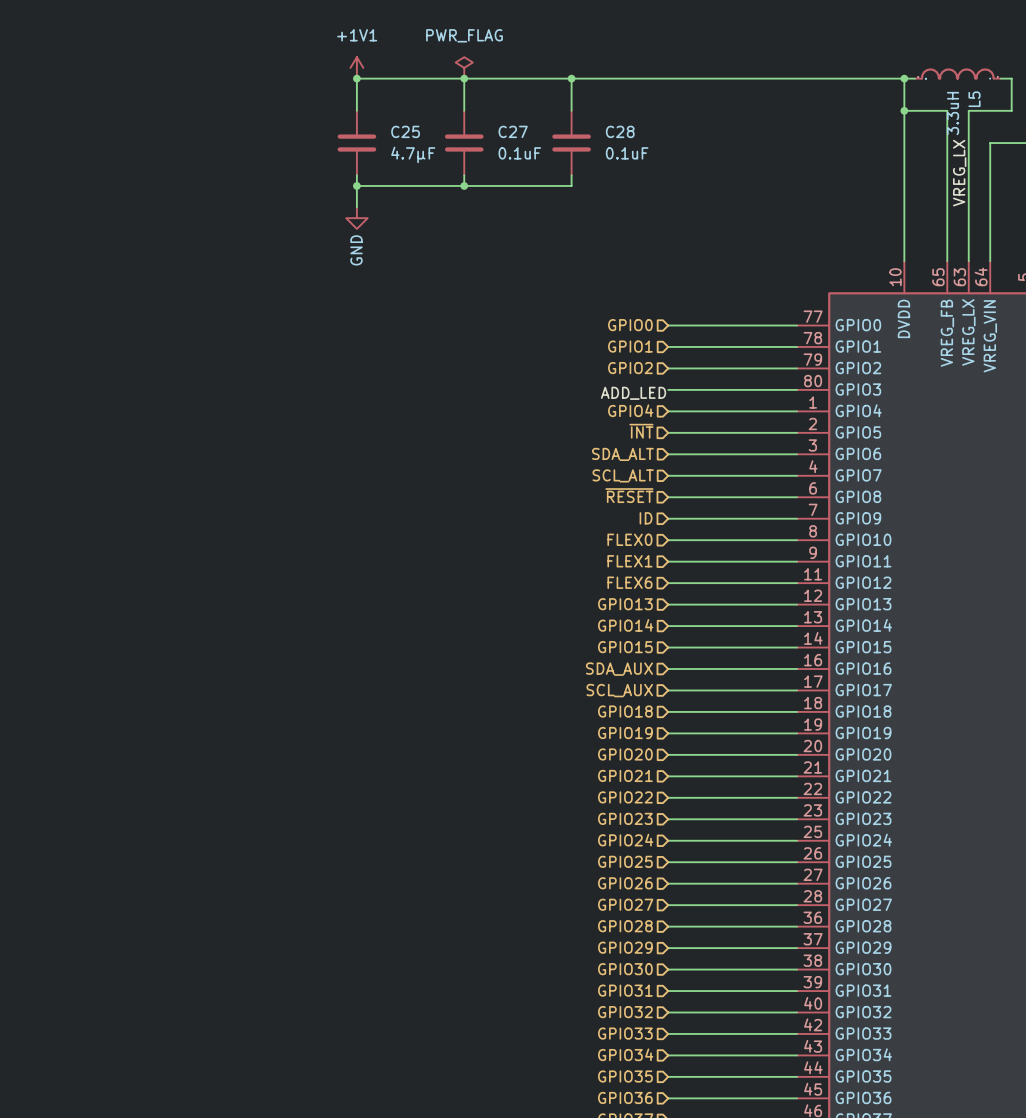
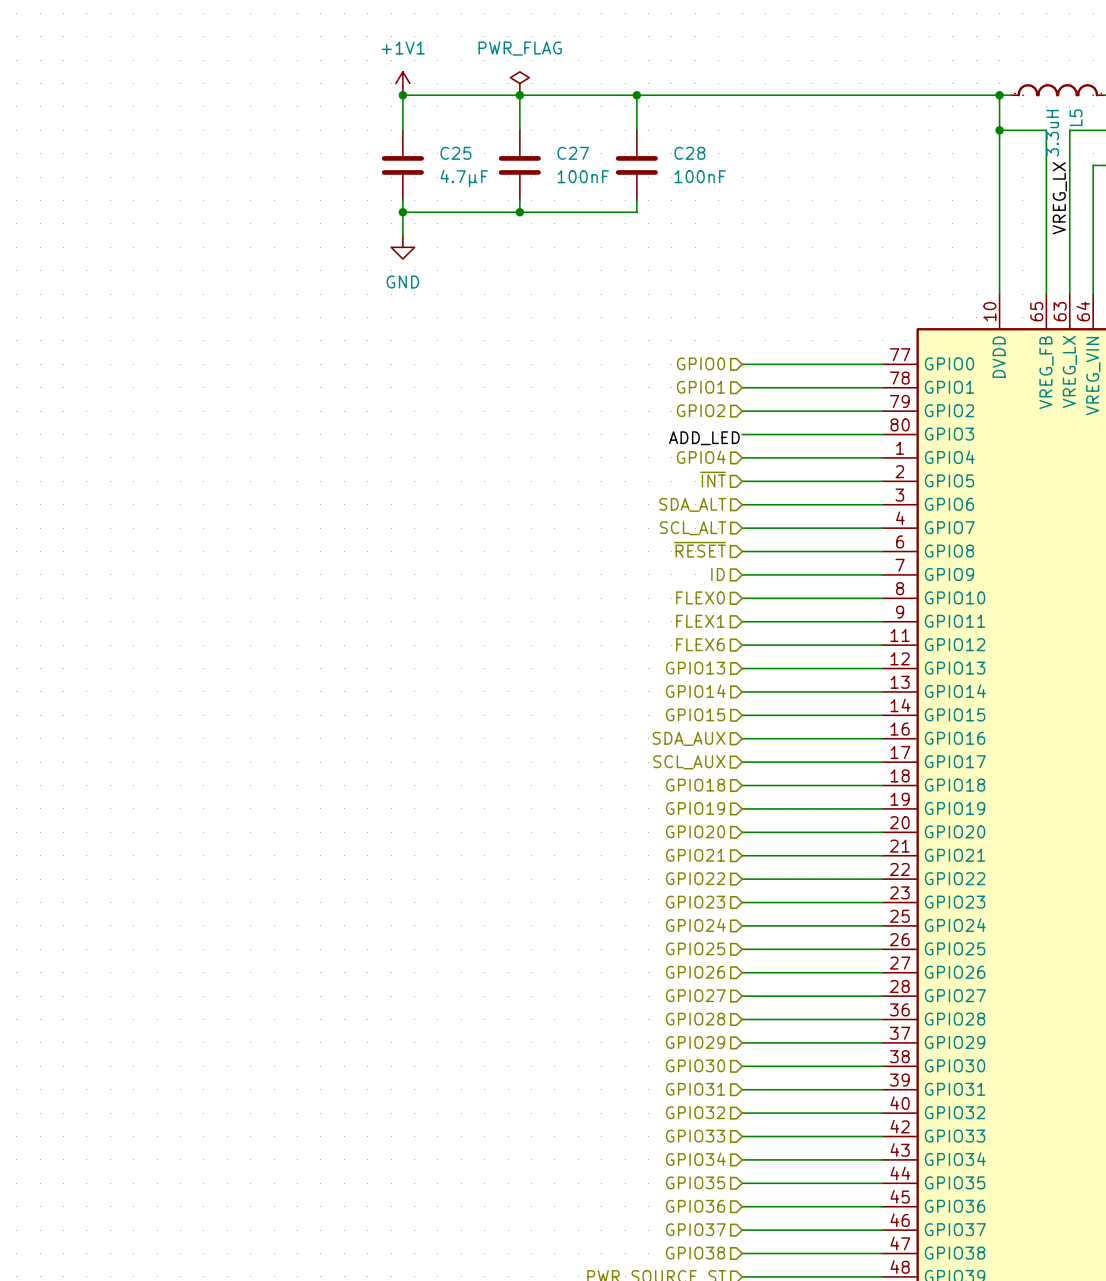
C27 value: 0.1uF (519, 153) -> 100nF (583, 176)
C28 value: 0.1uF (627, 153) -> 100nF (700, 176)
power symbol text rotation: 0° (356, 250) -> 90° clockwise (402, 282)

